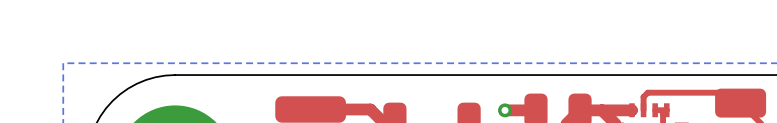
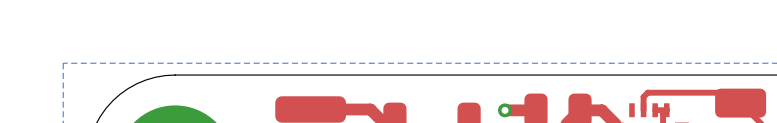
top track: (631, 110) (601, 110) -> none

